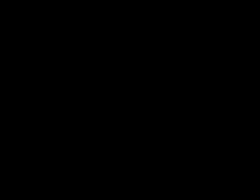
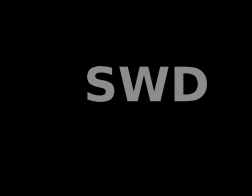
text: none -> SWD (147, 83)

